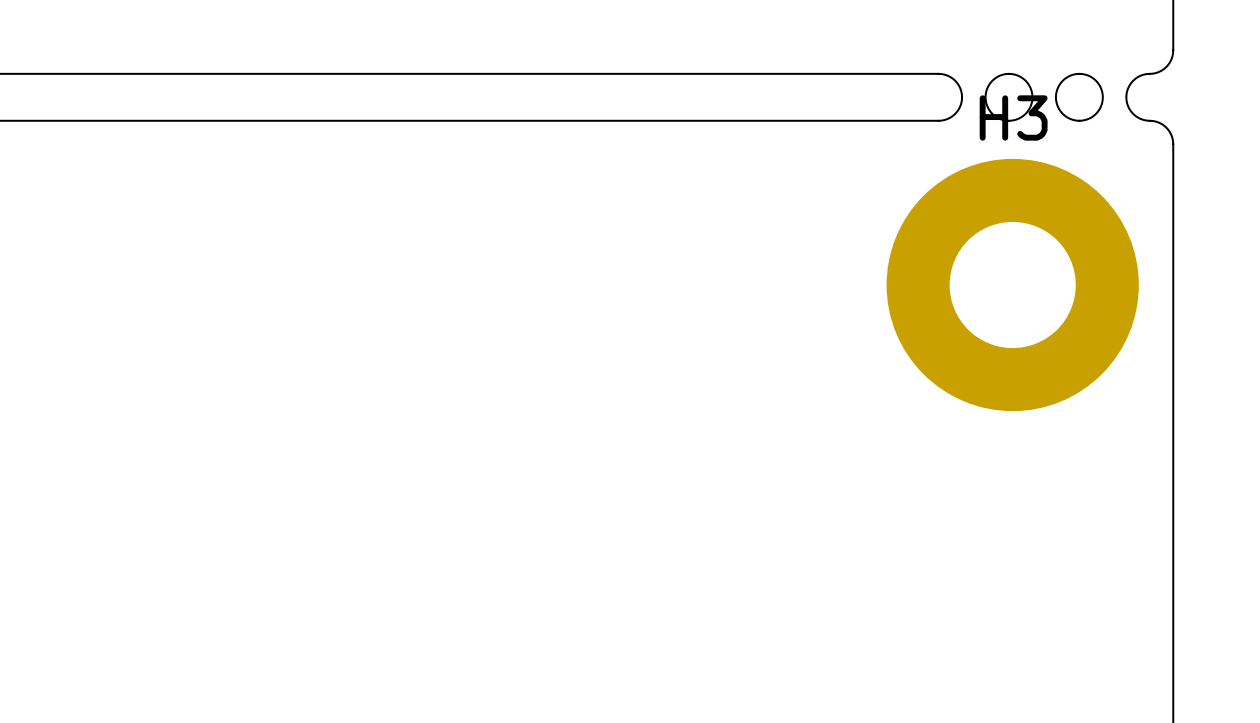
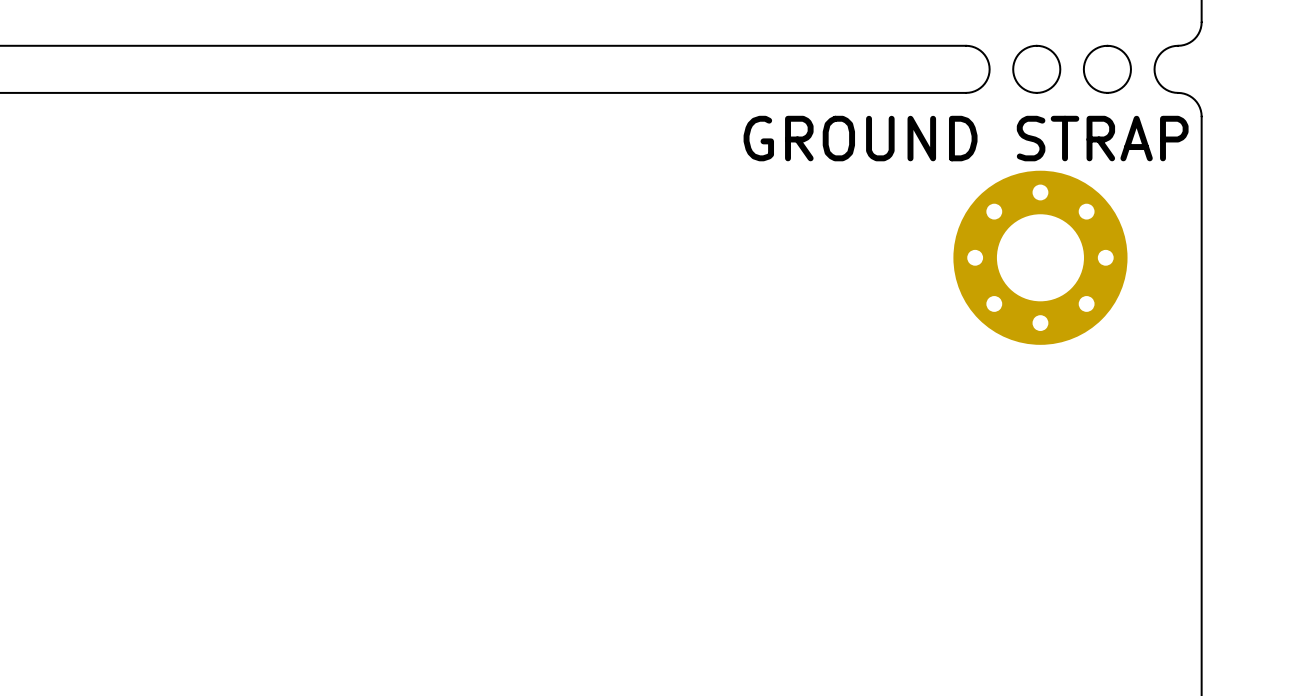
H3: (1012, 285) -> none
part: none -> GROUND STRAP (1040, 257)

